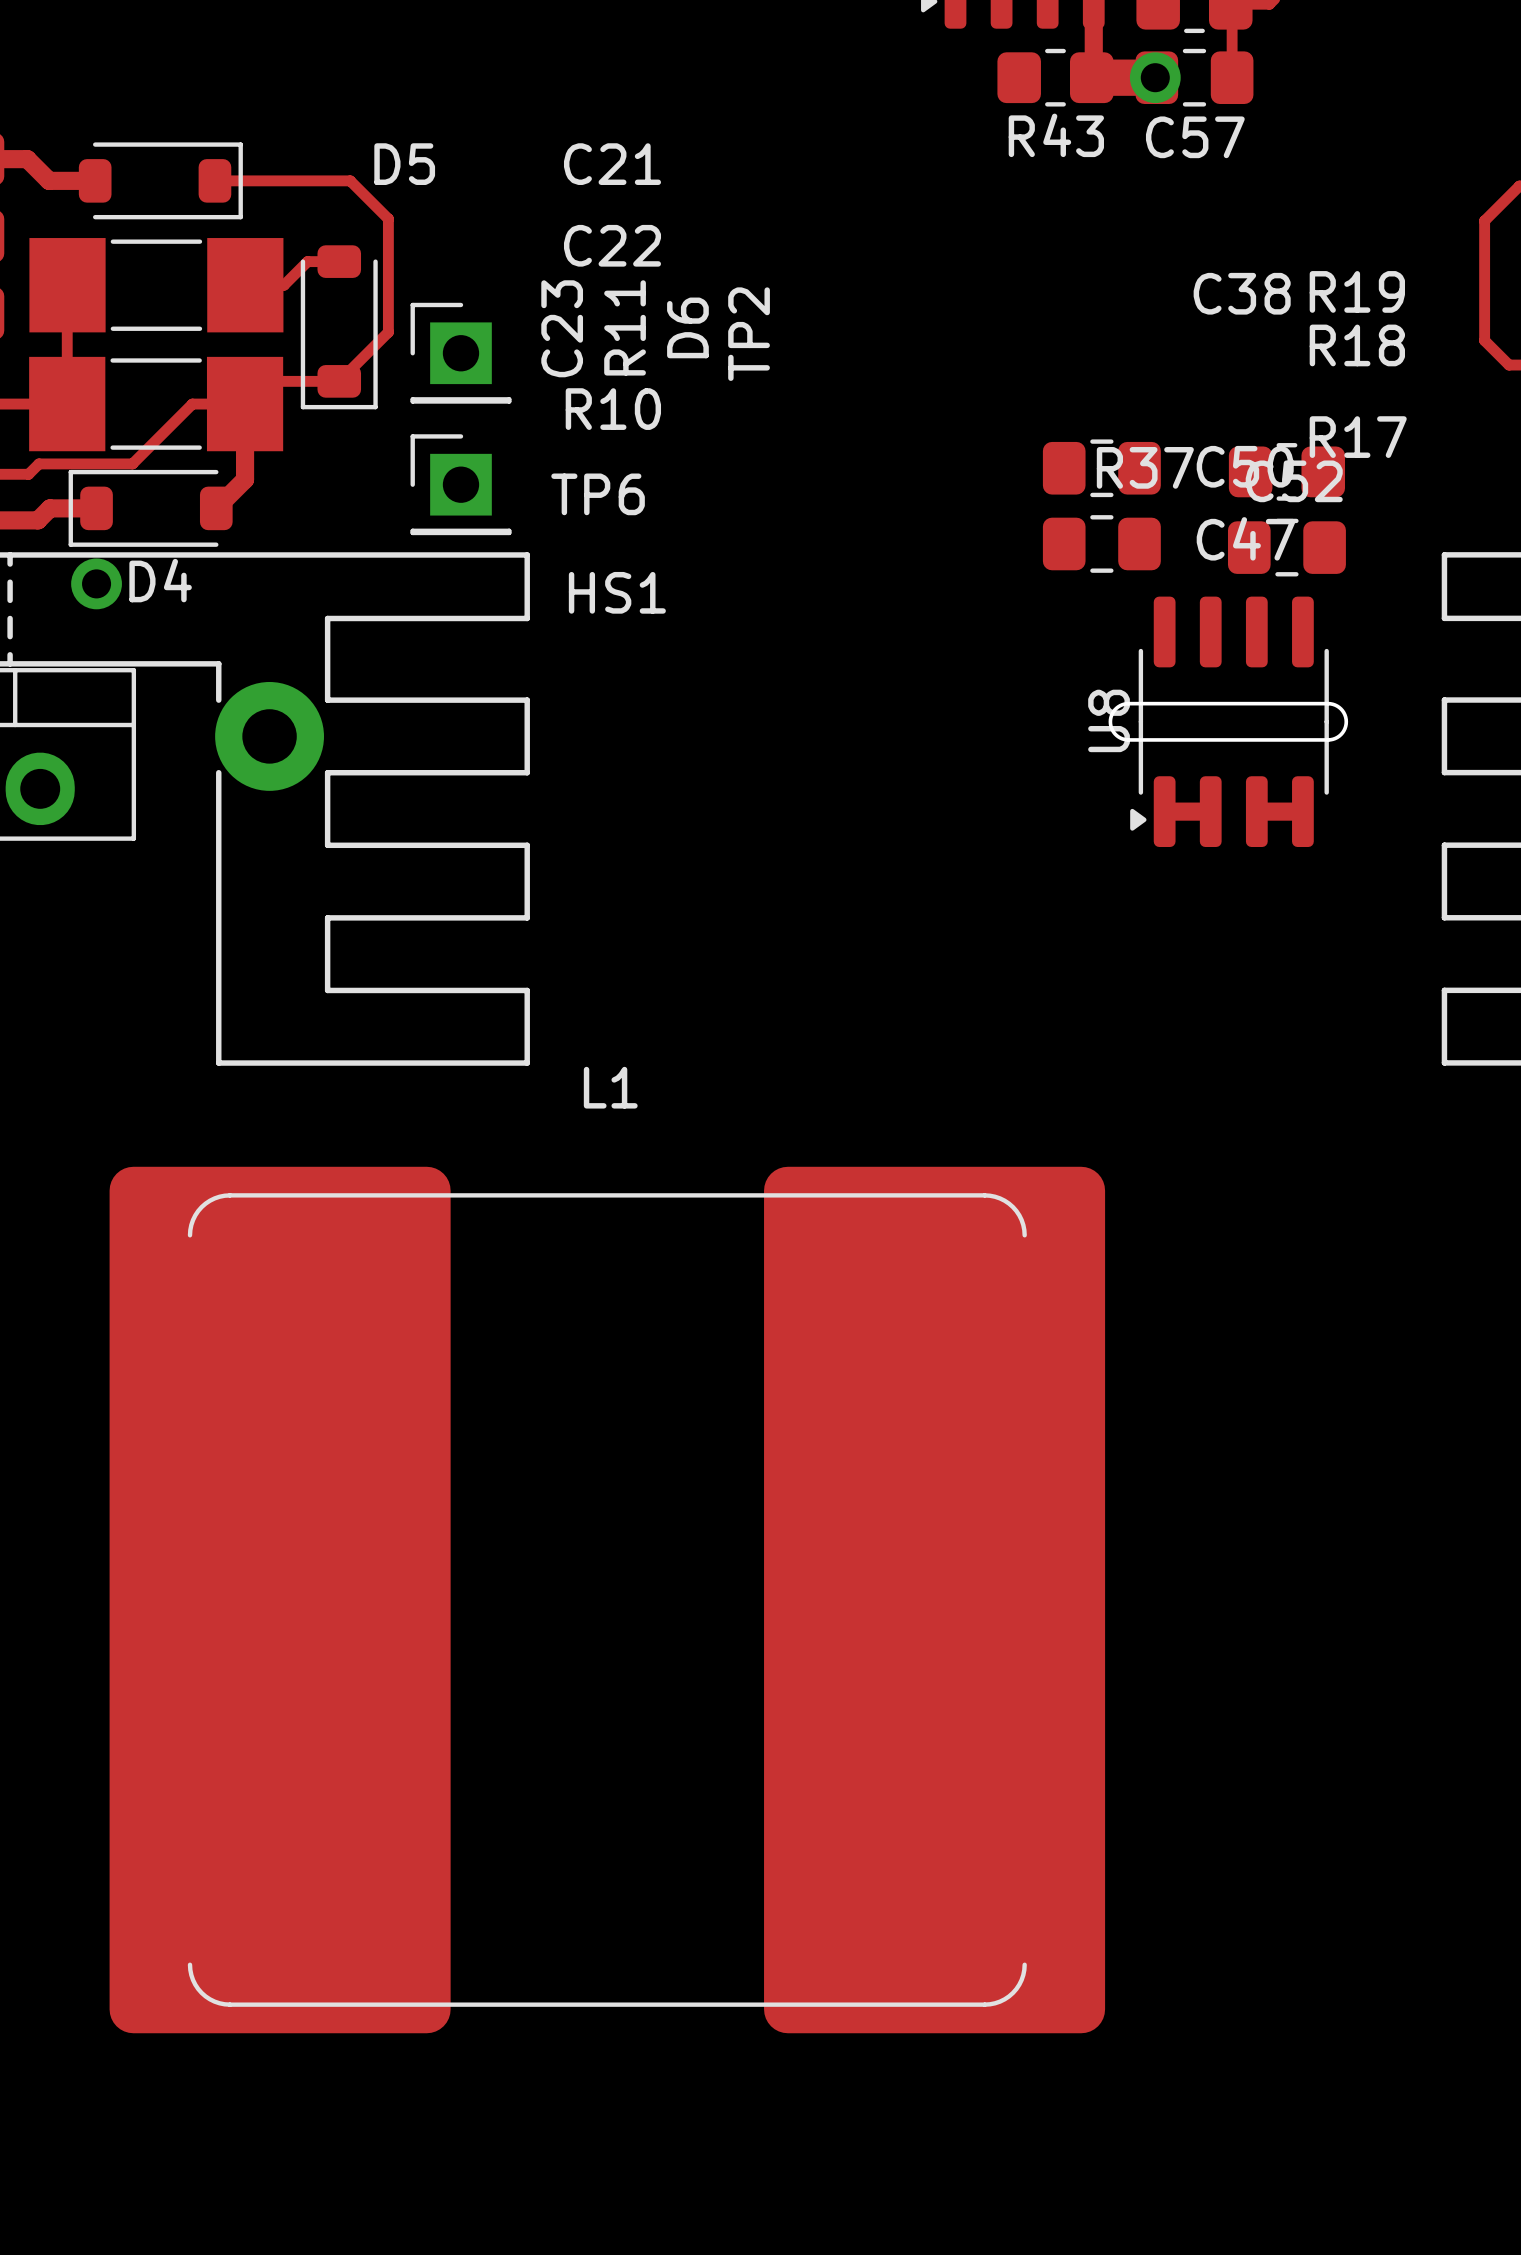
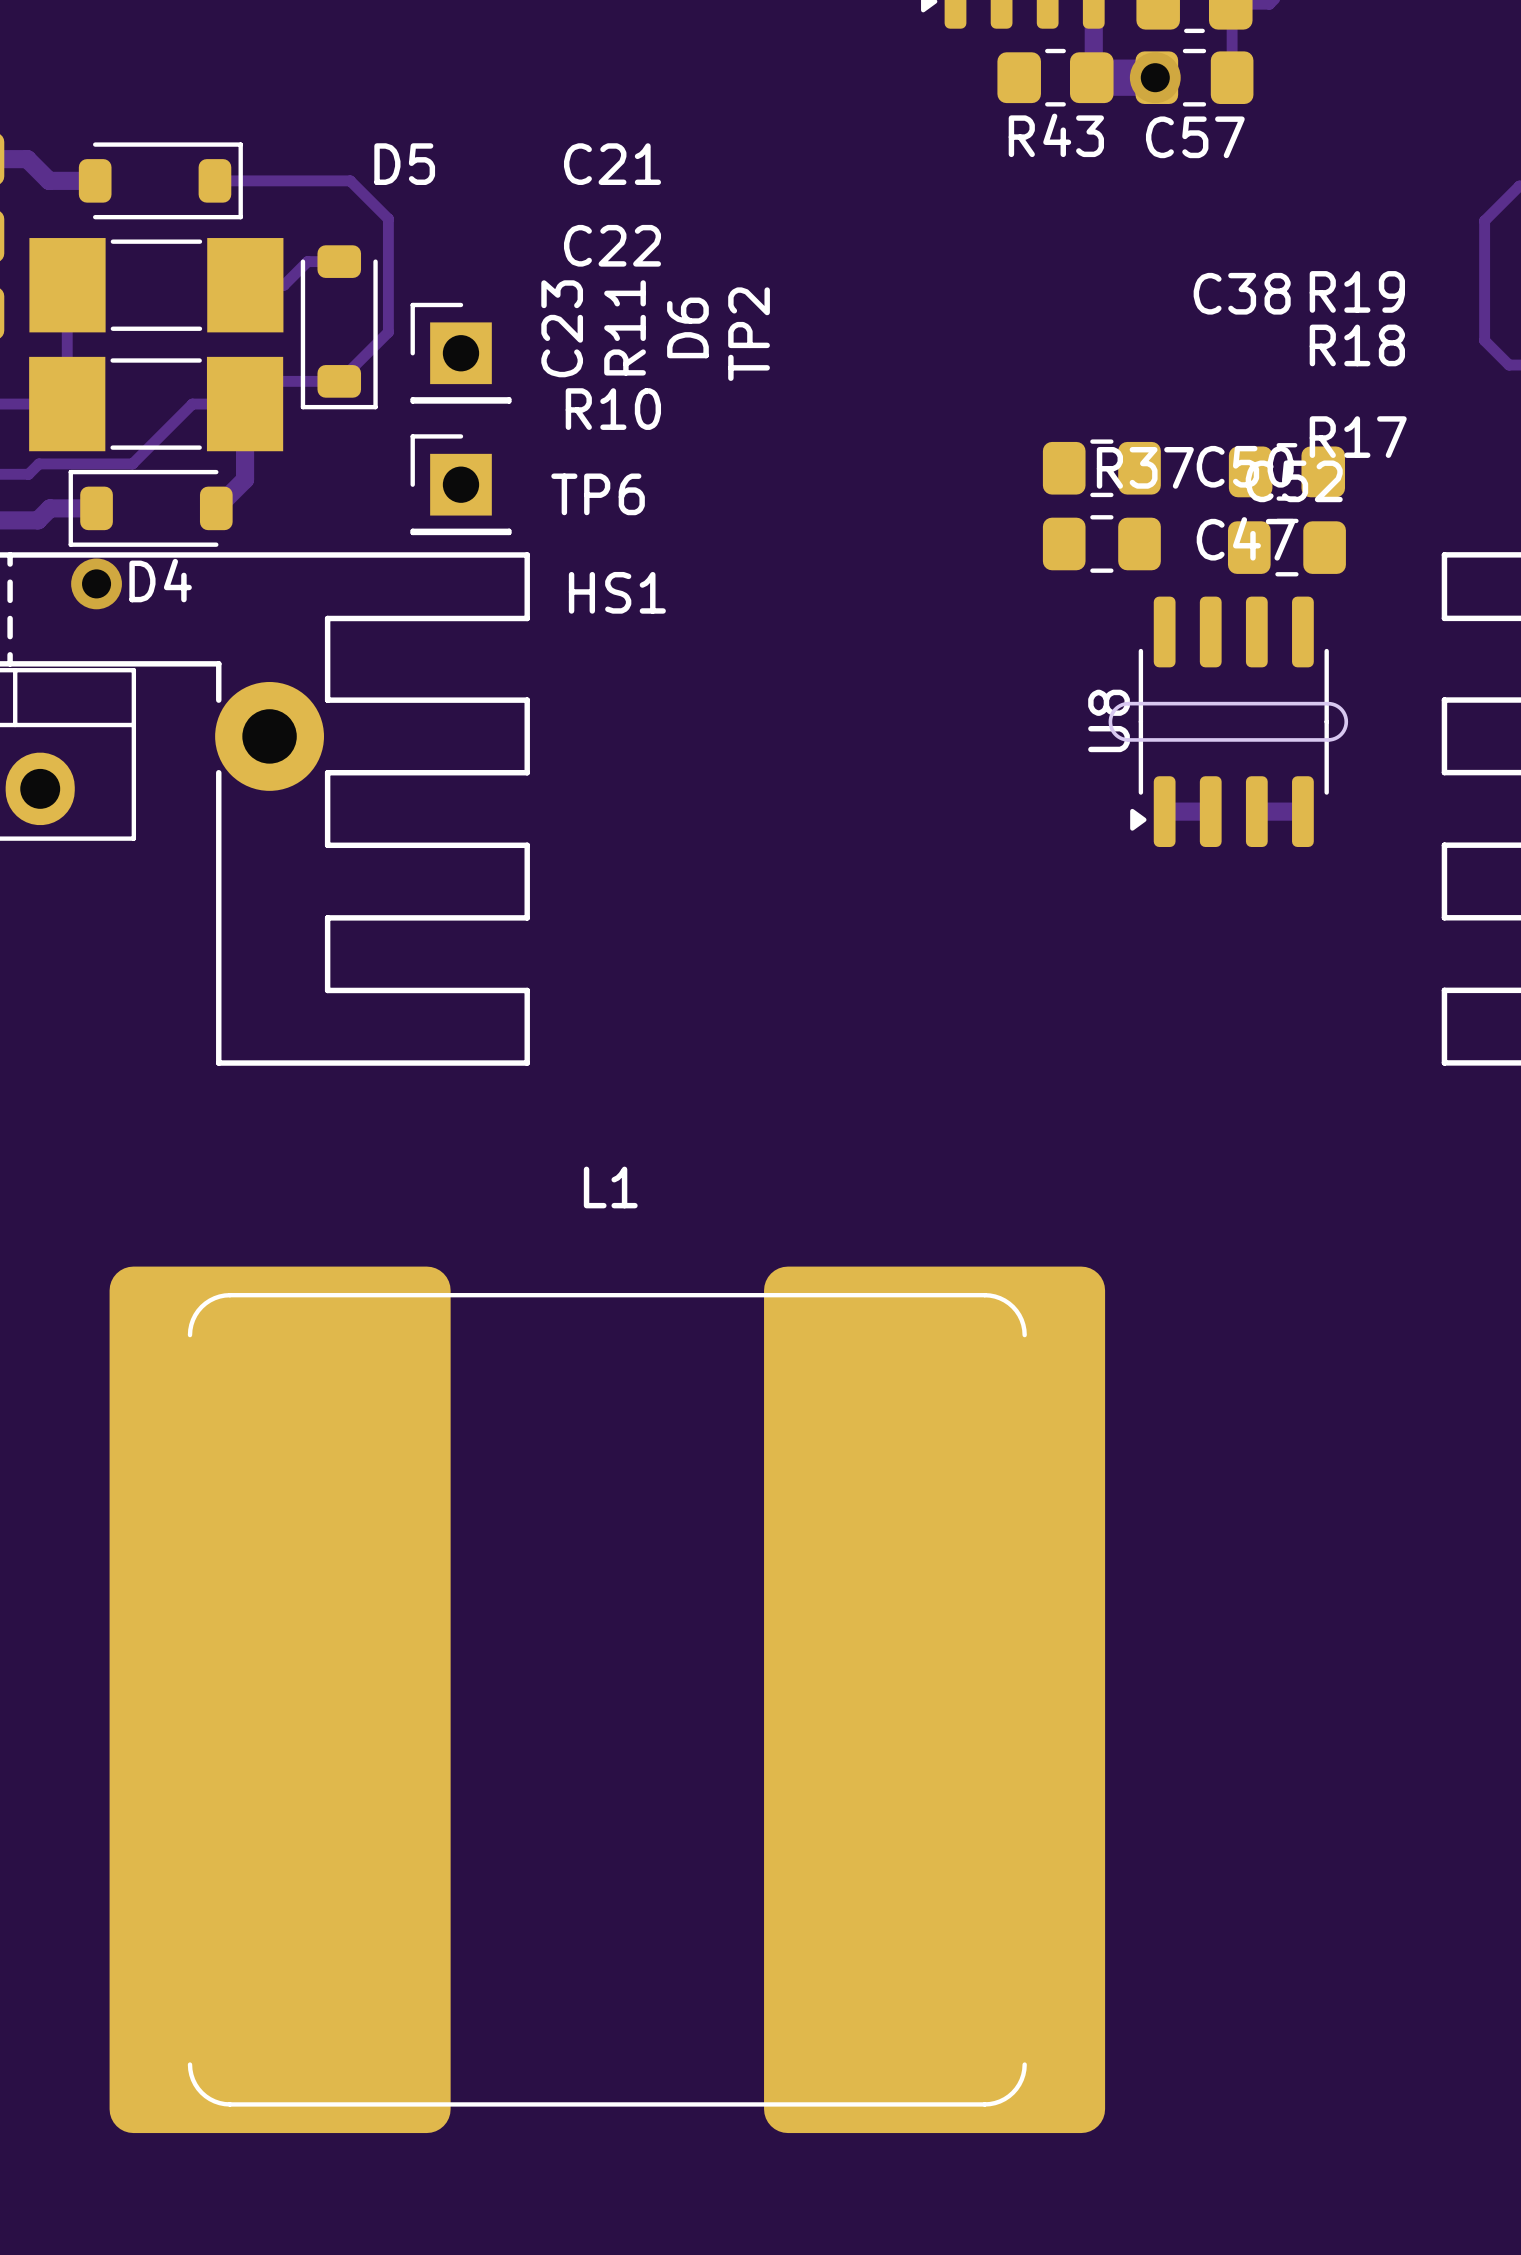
L1 position: (607, 1600) -> (607, 1699)

